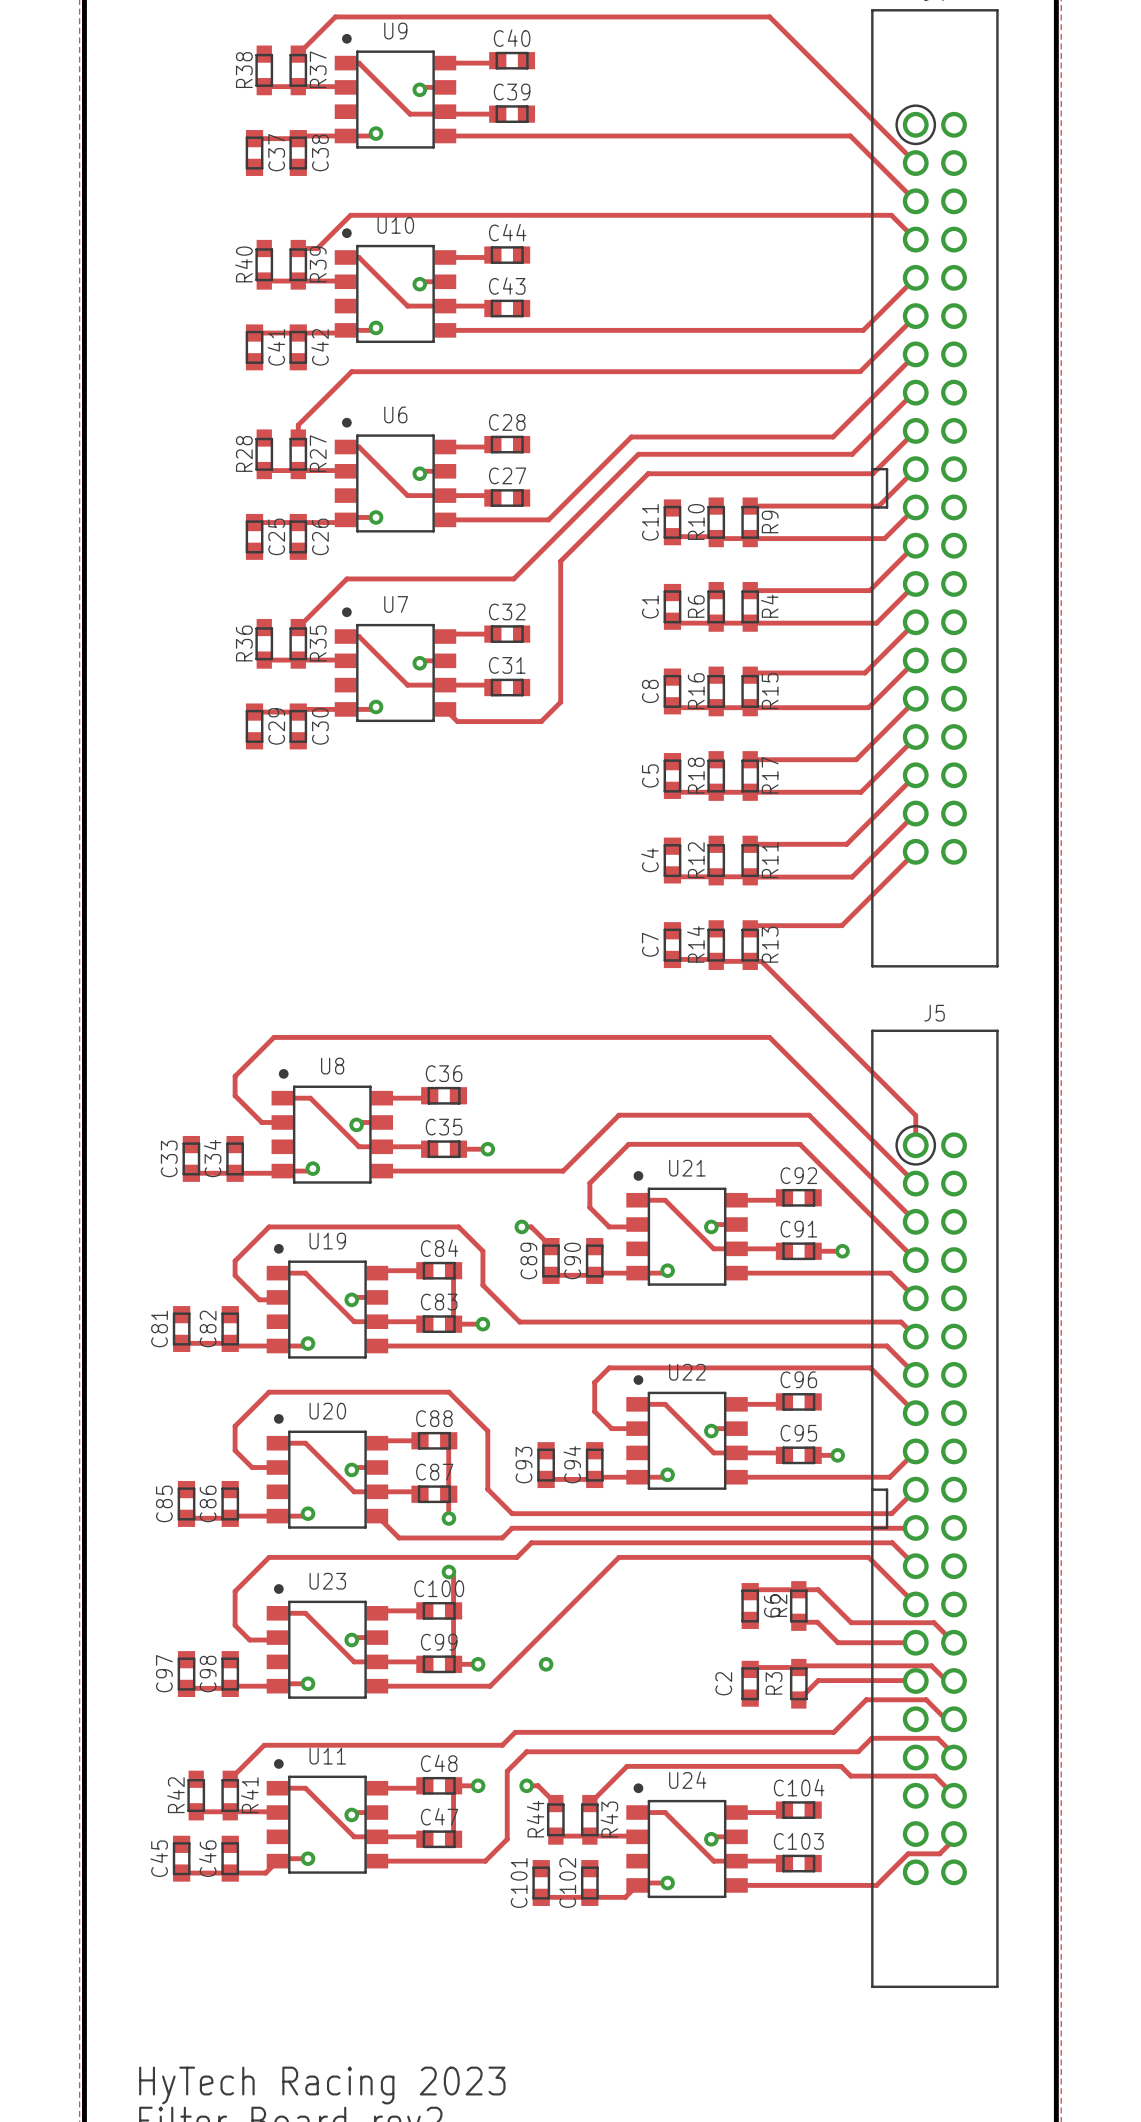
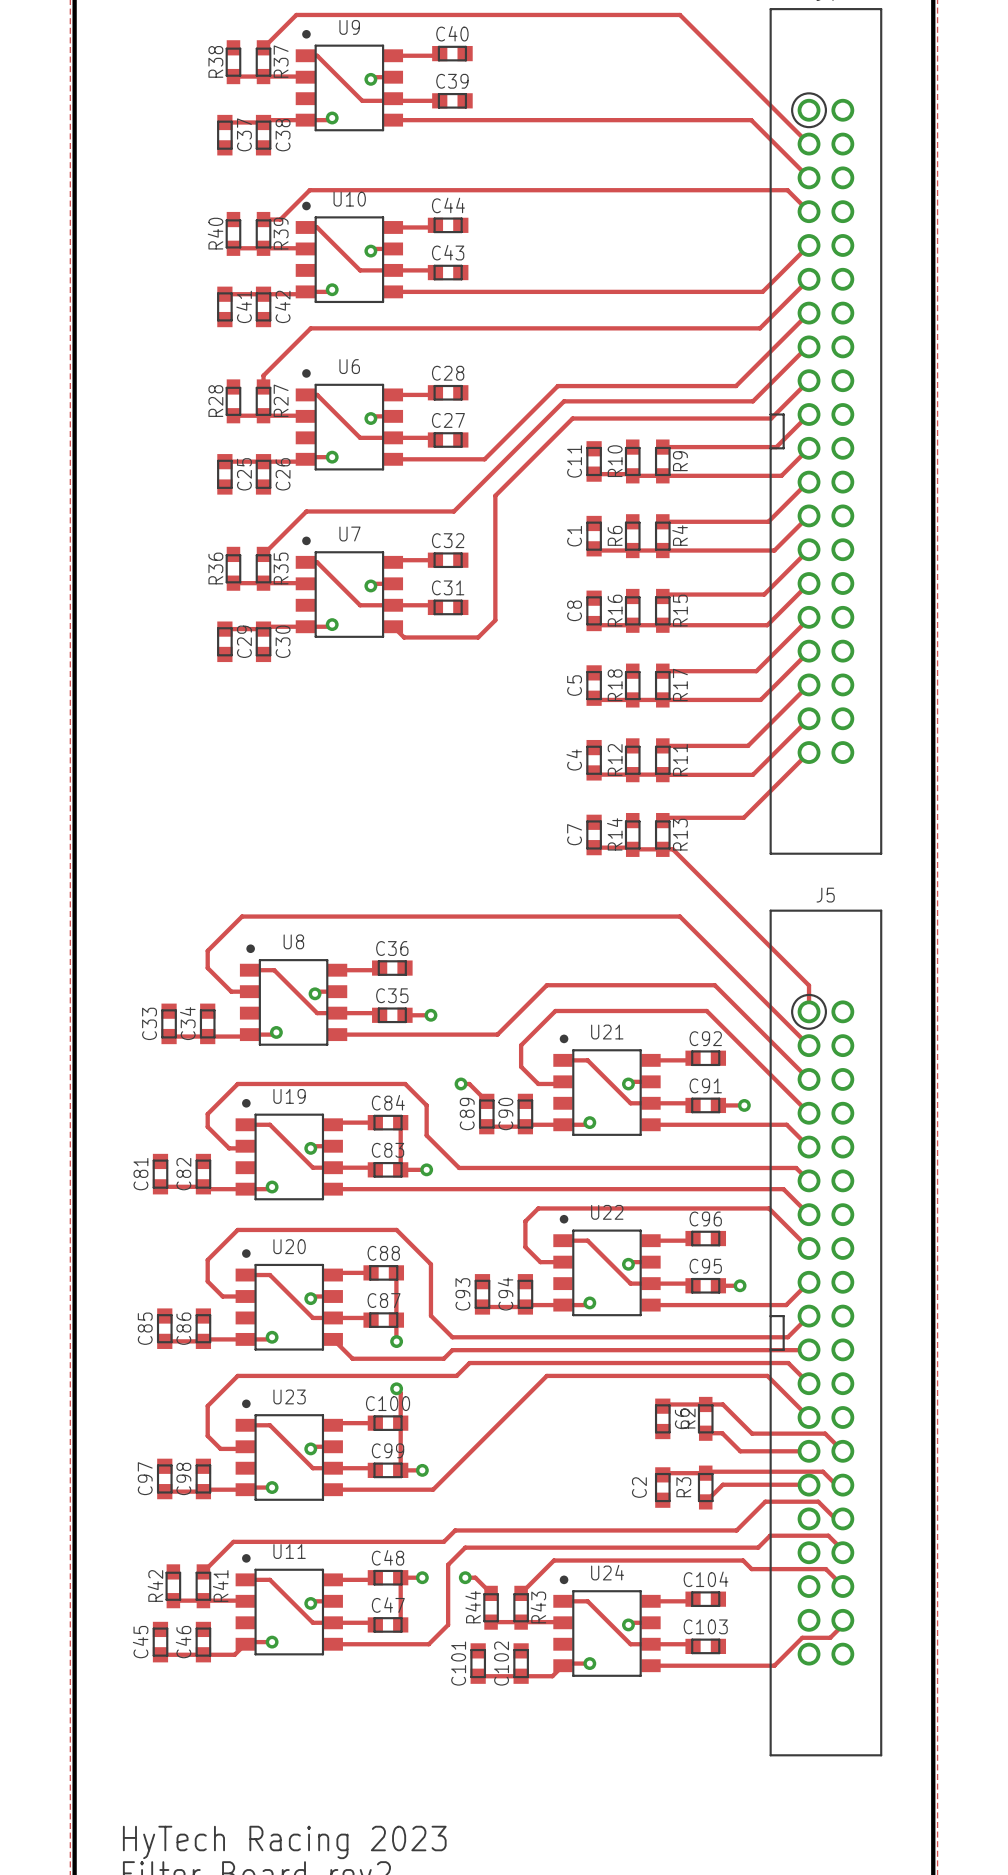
via: (546, 1664) -> none

